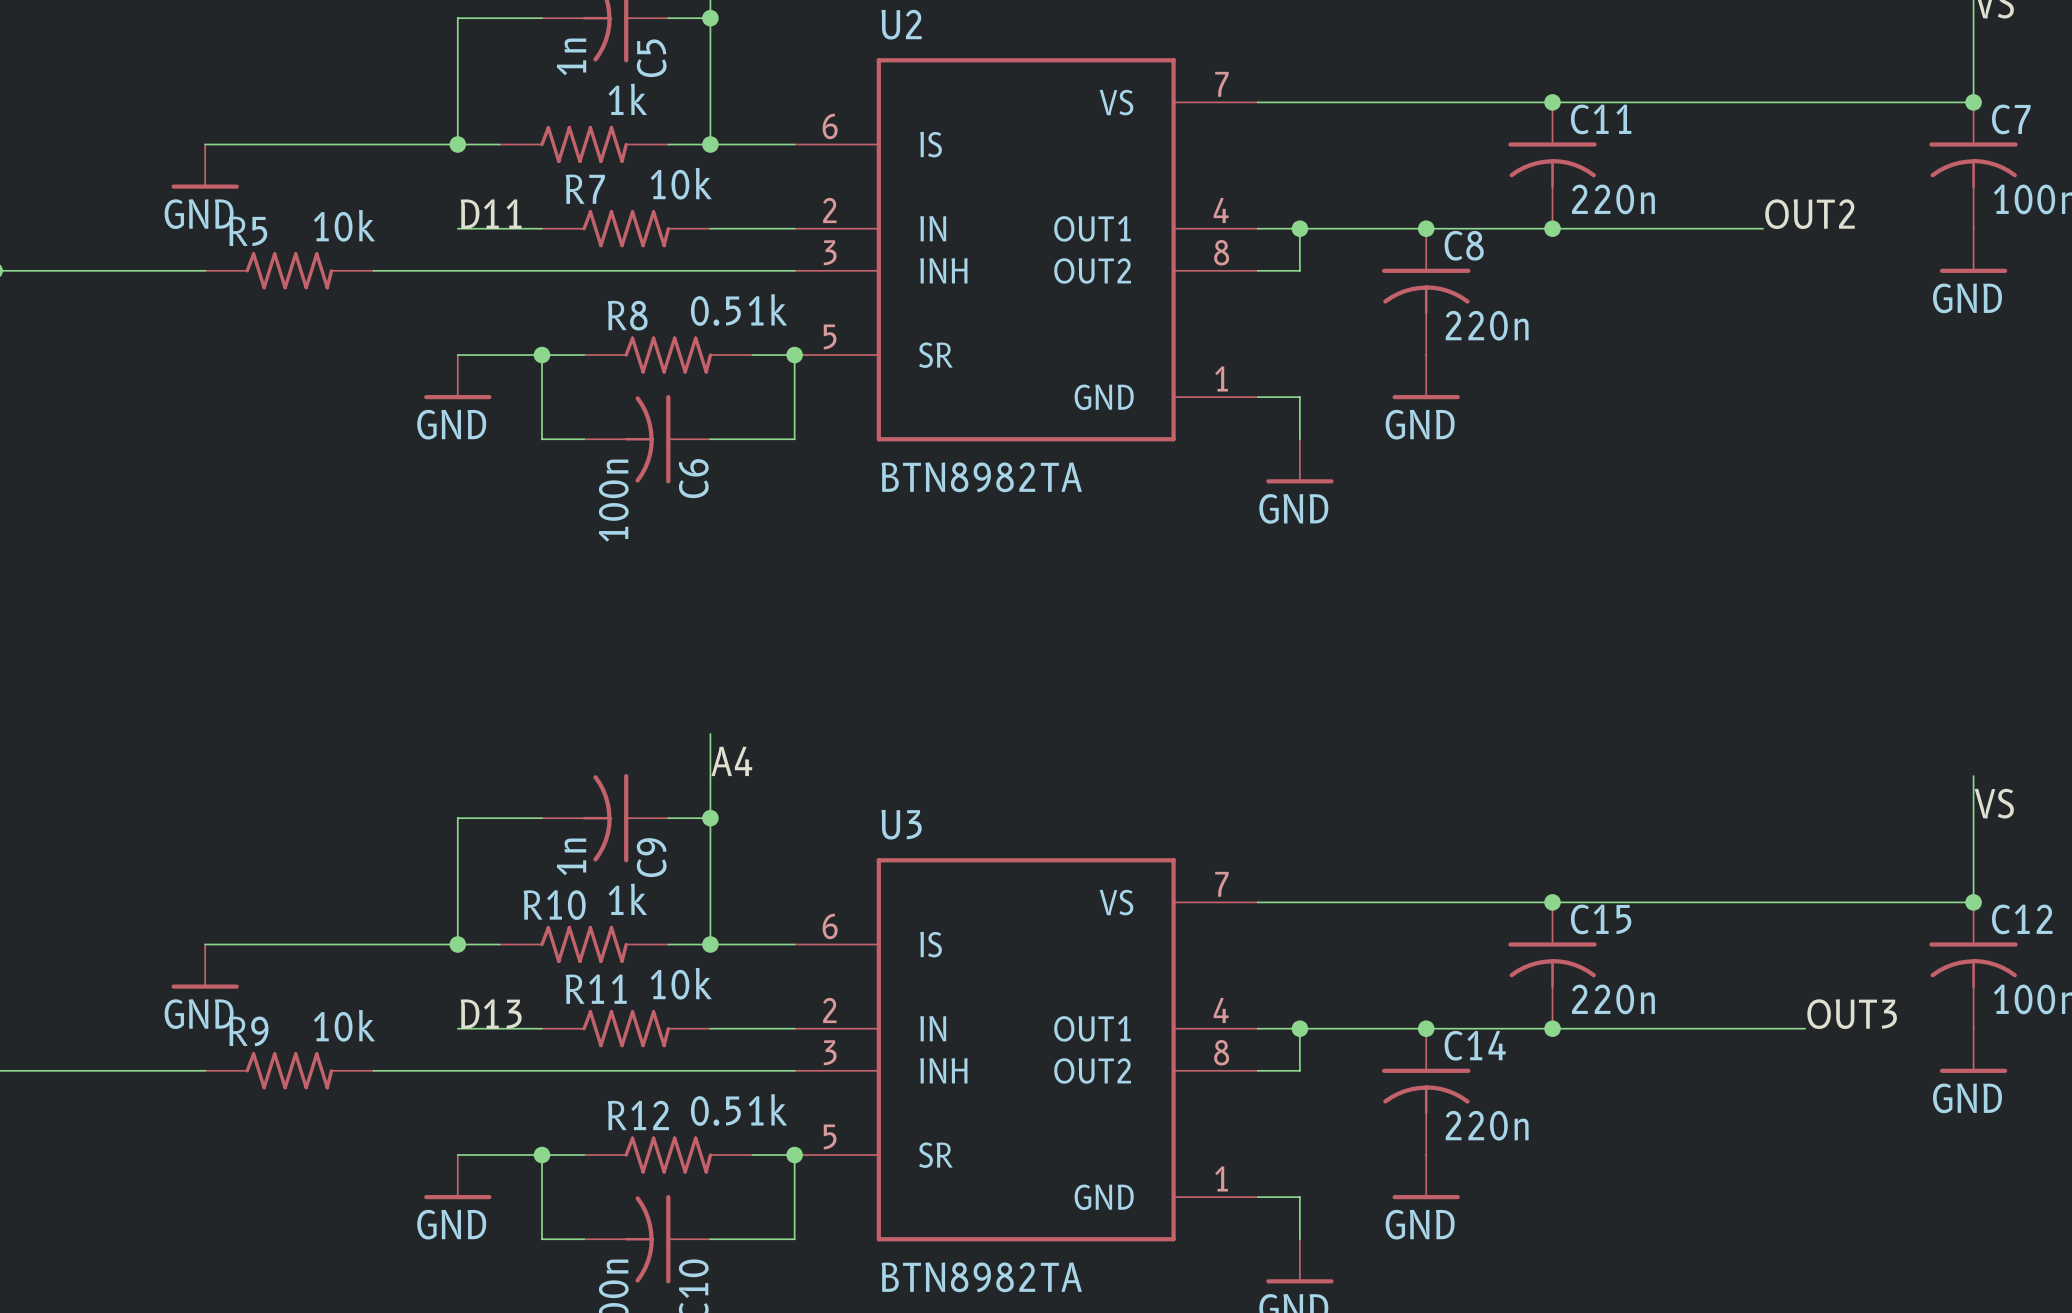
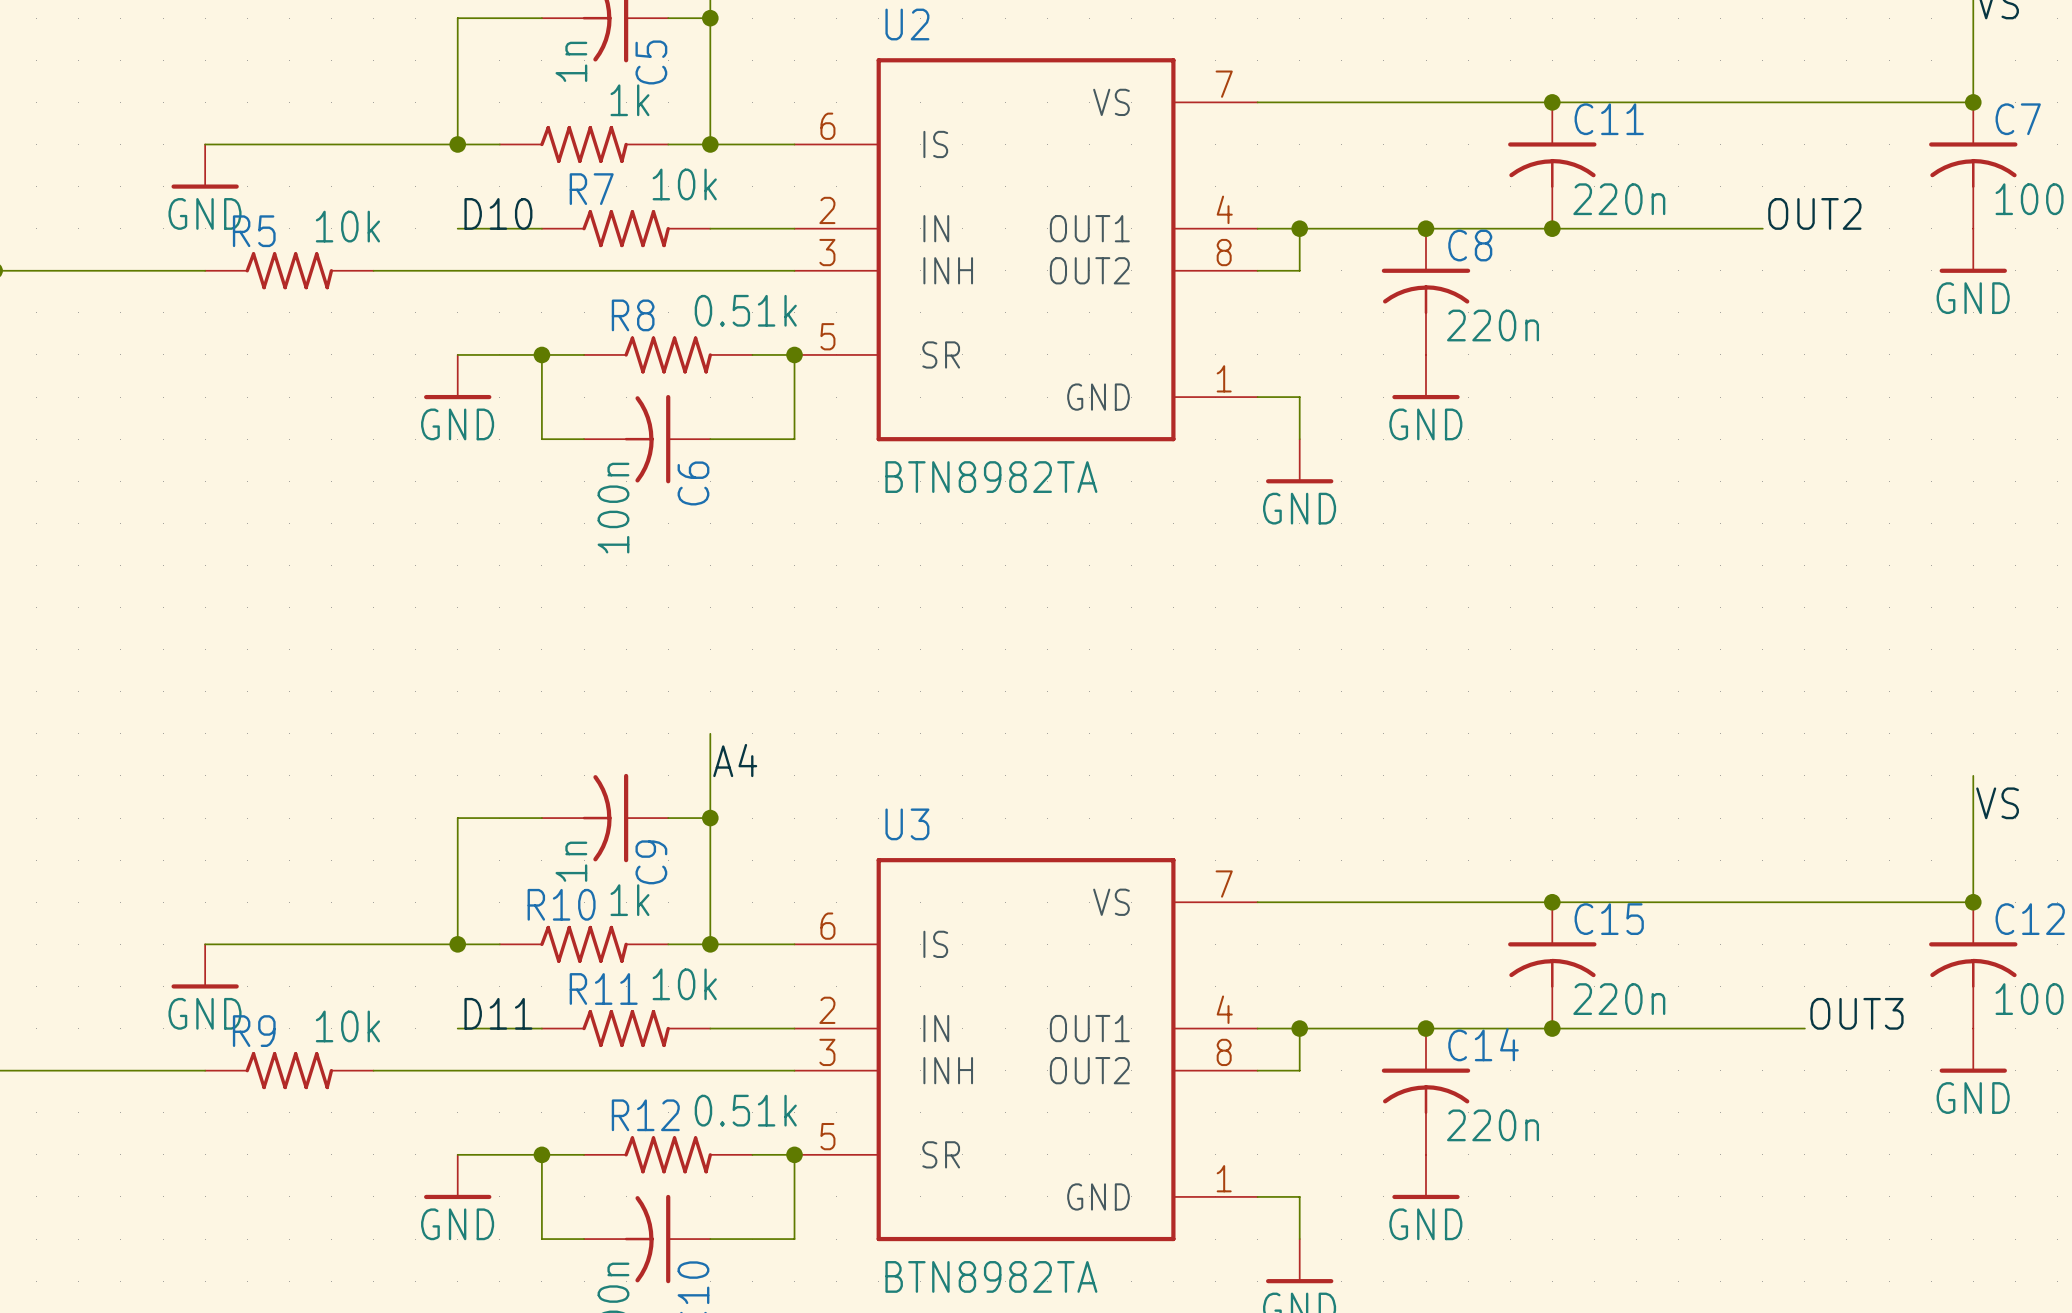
label: D11 (491, 213) -> D10 (498, 213)
label: D13 (491, 1013) -> D11 (498, 1013)

